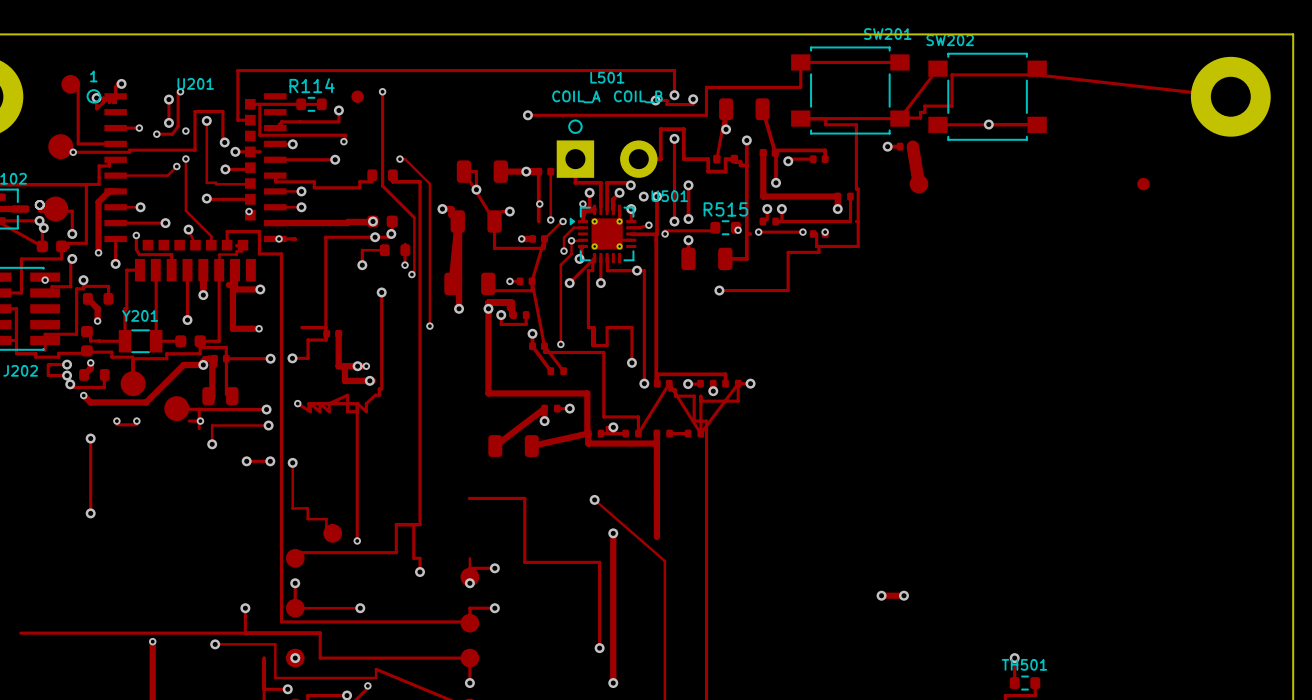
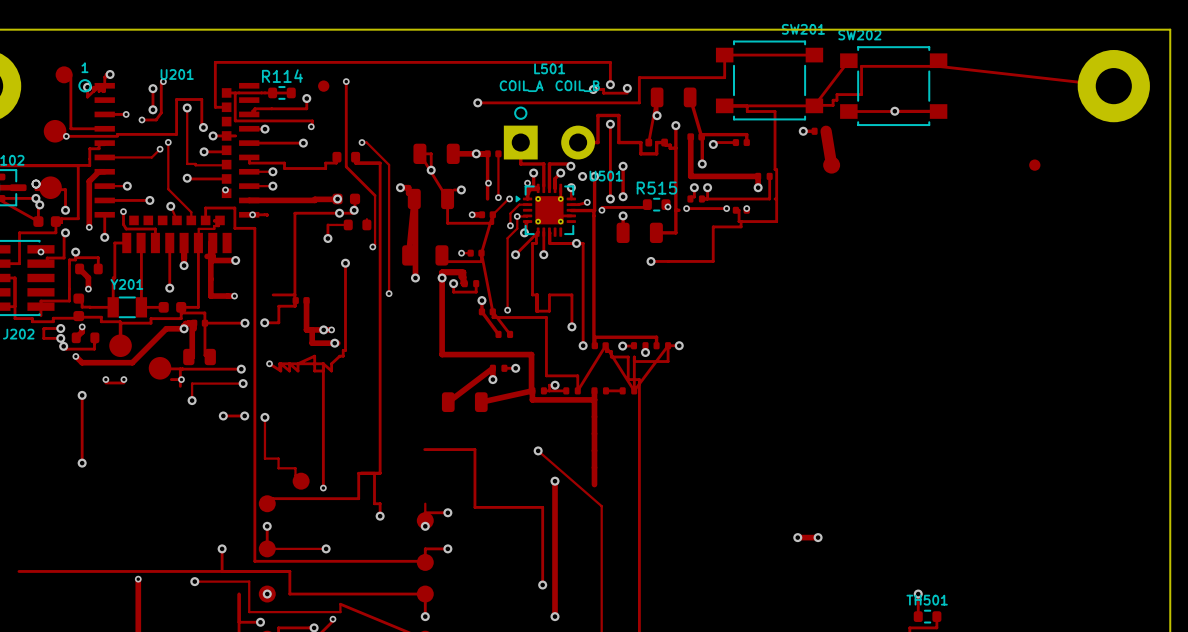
via: (185, 131) -> none
track: (405, 256) (405, 265) -> none
via: (405, 265) -> none

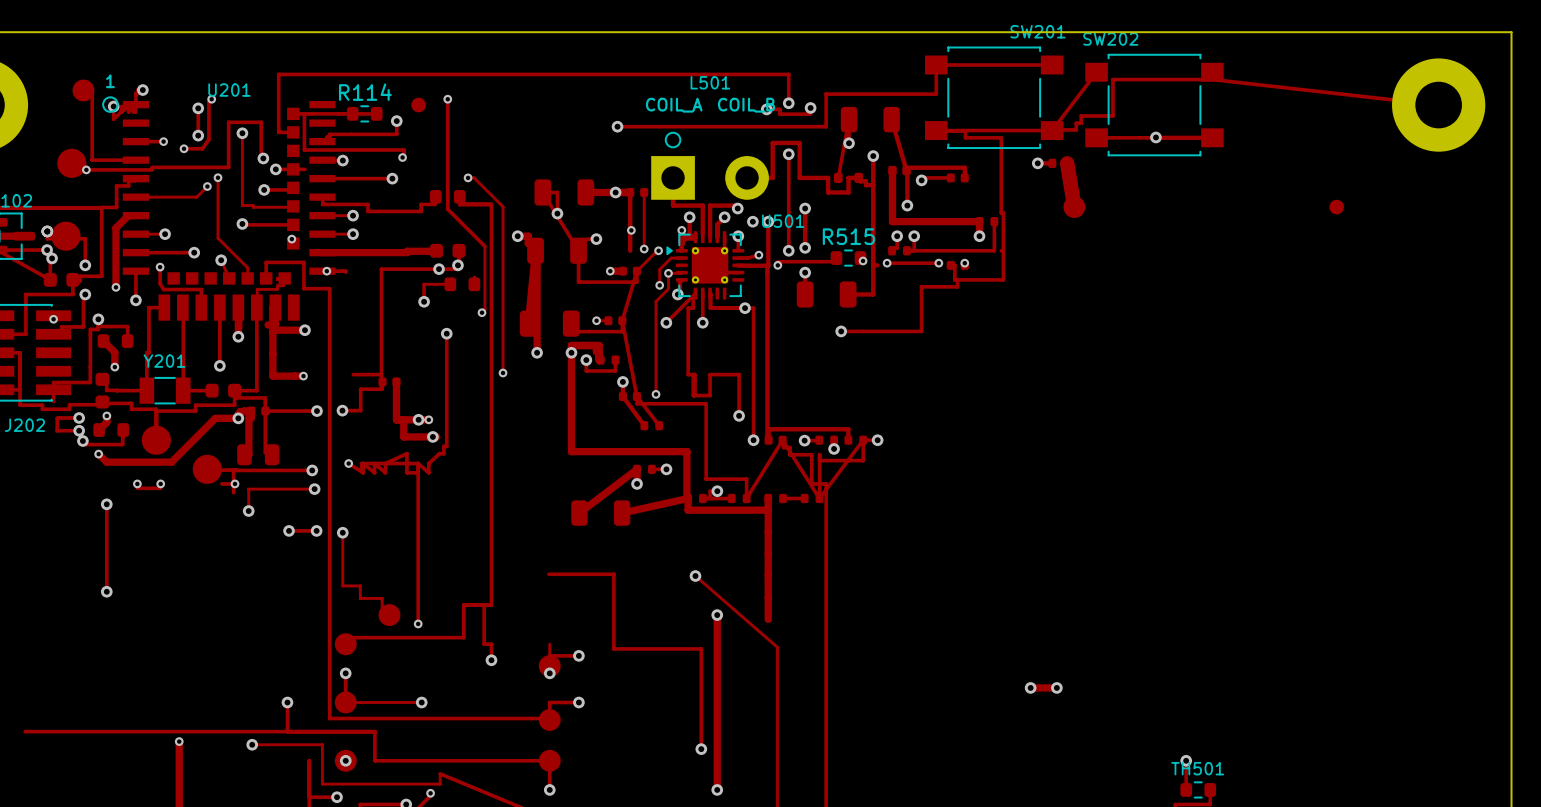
via: (337, 198) -> none

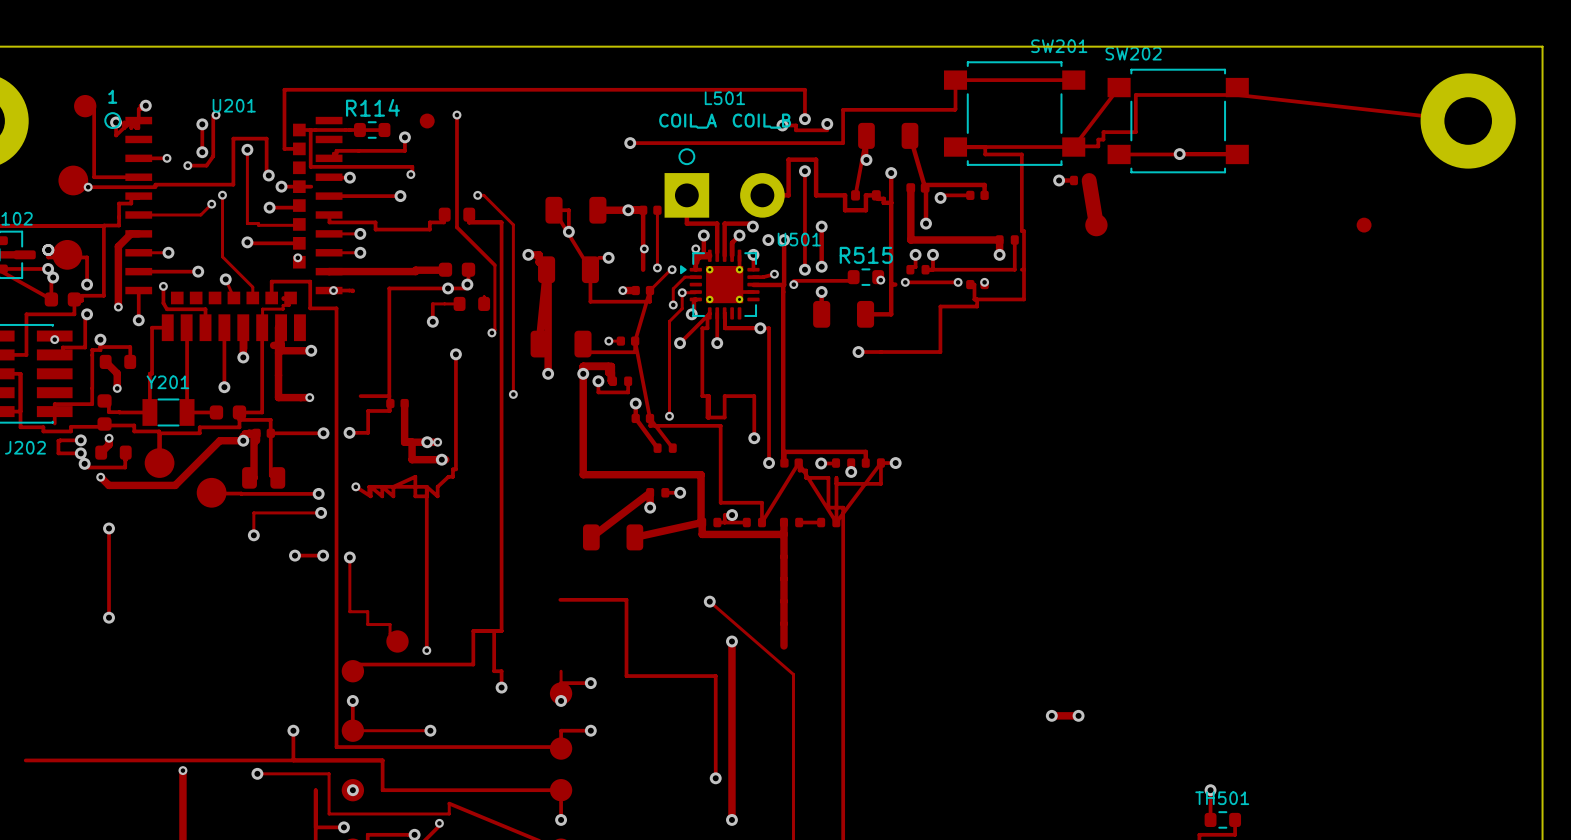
track: (233, 470) (233, 492) -> none
via: (137, 483) -> none
via: (160, 483) -> none
track: (221, 483) (233, 483) -> none
via: (235, 483) -> none
track: (137, 488) (160, 488) -> none

